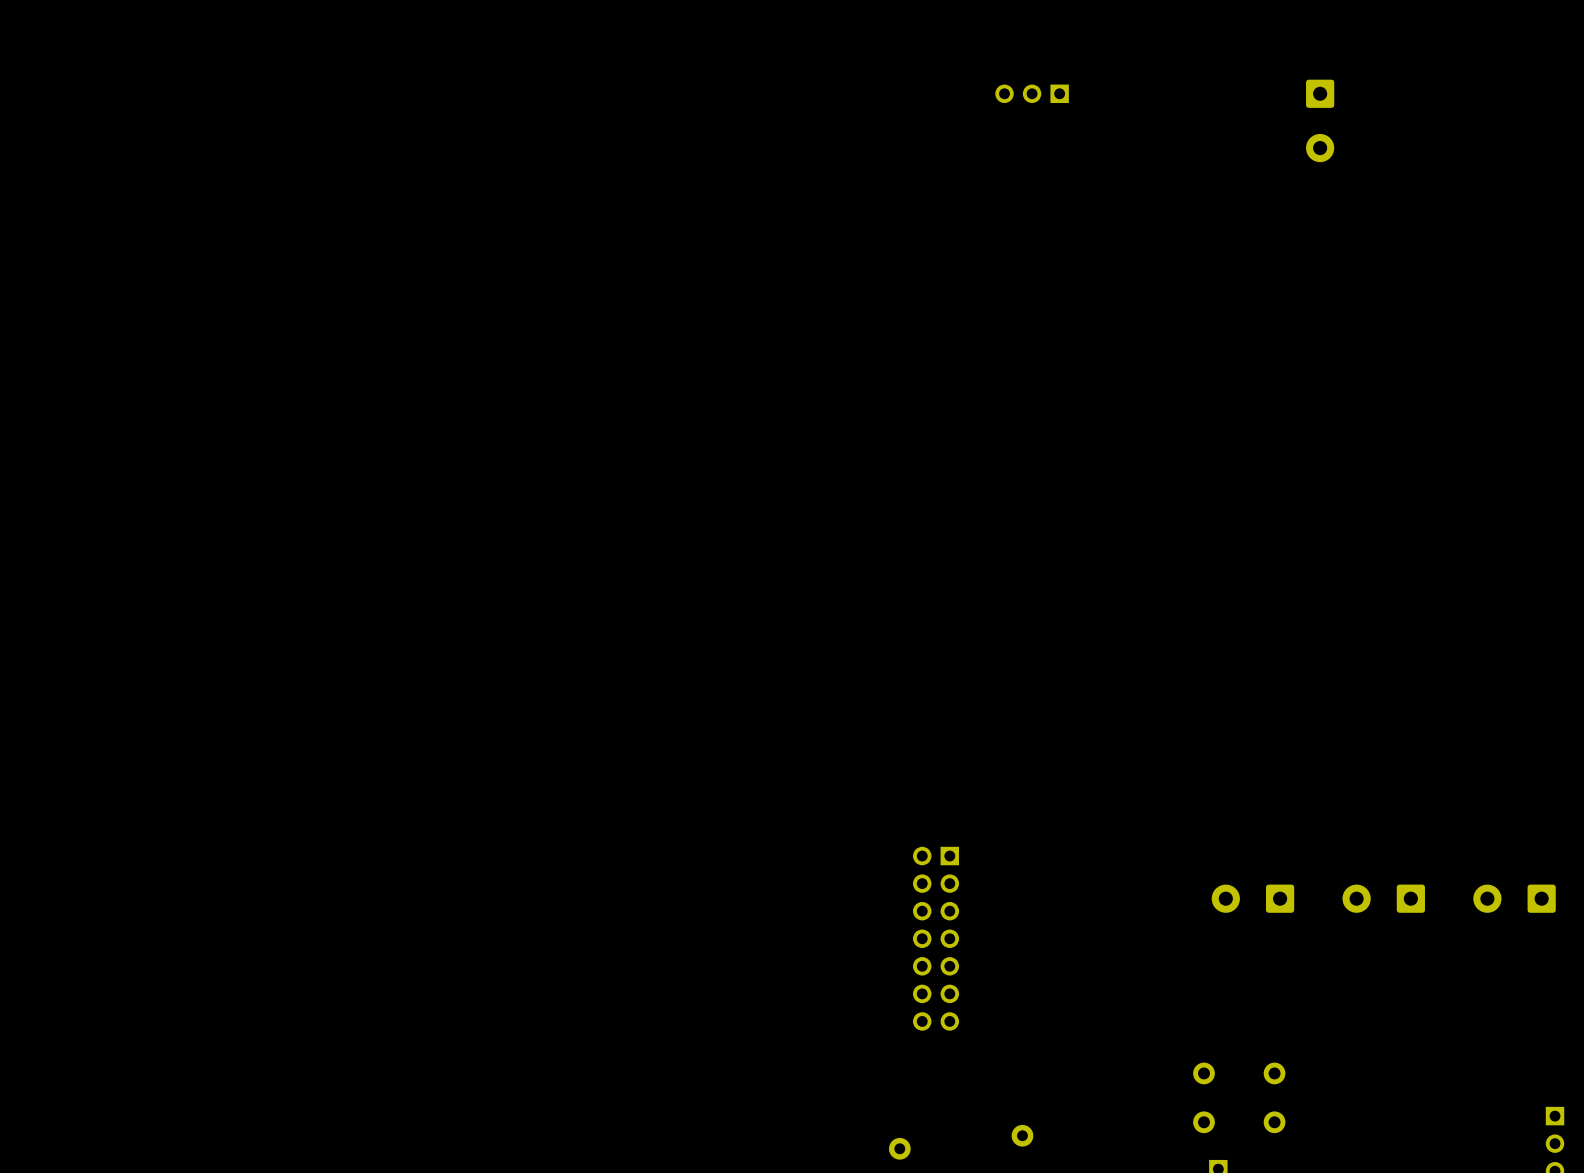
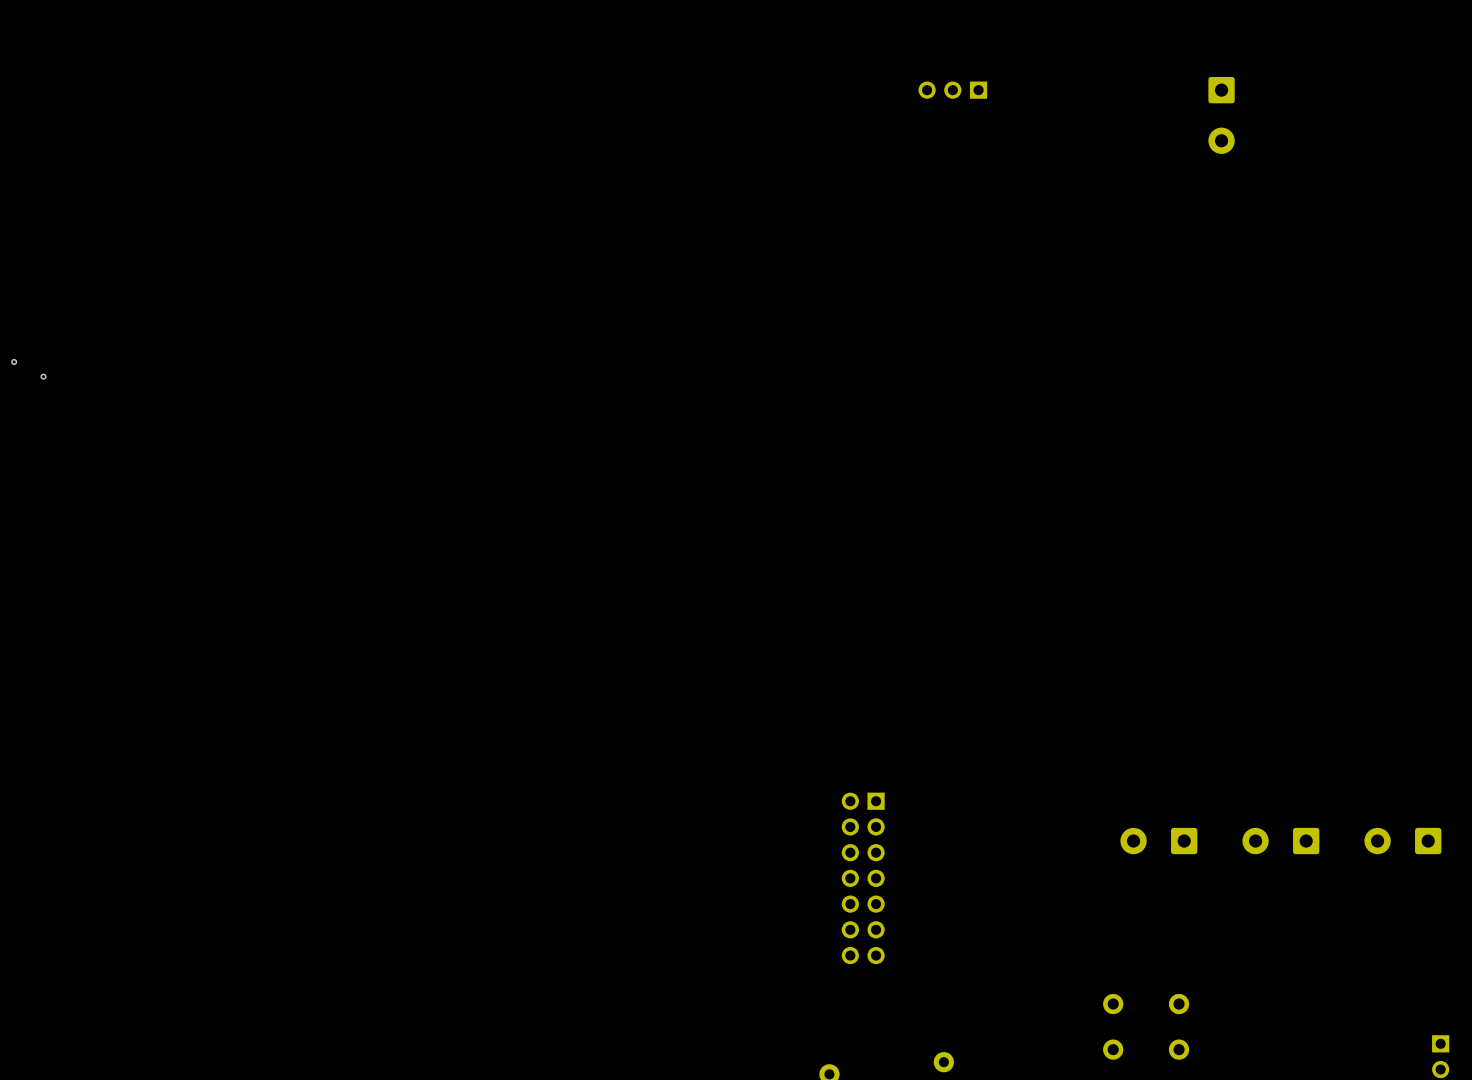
via: none -> (14, 362)
via: none -> (43, 376)

